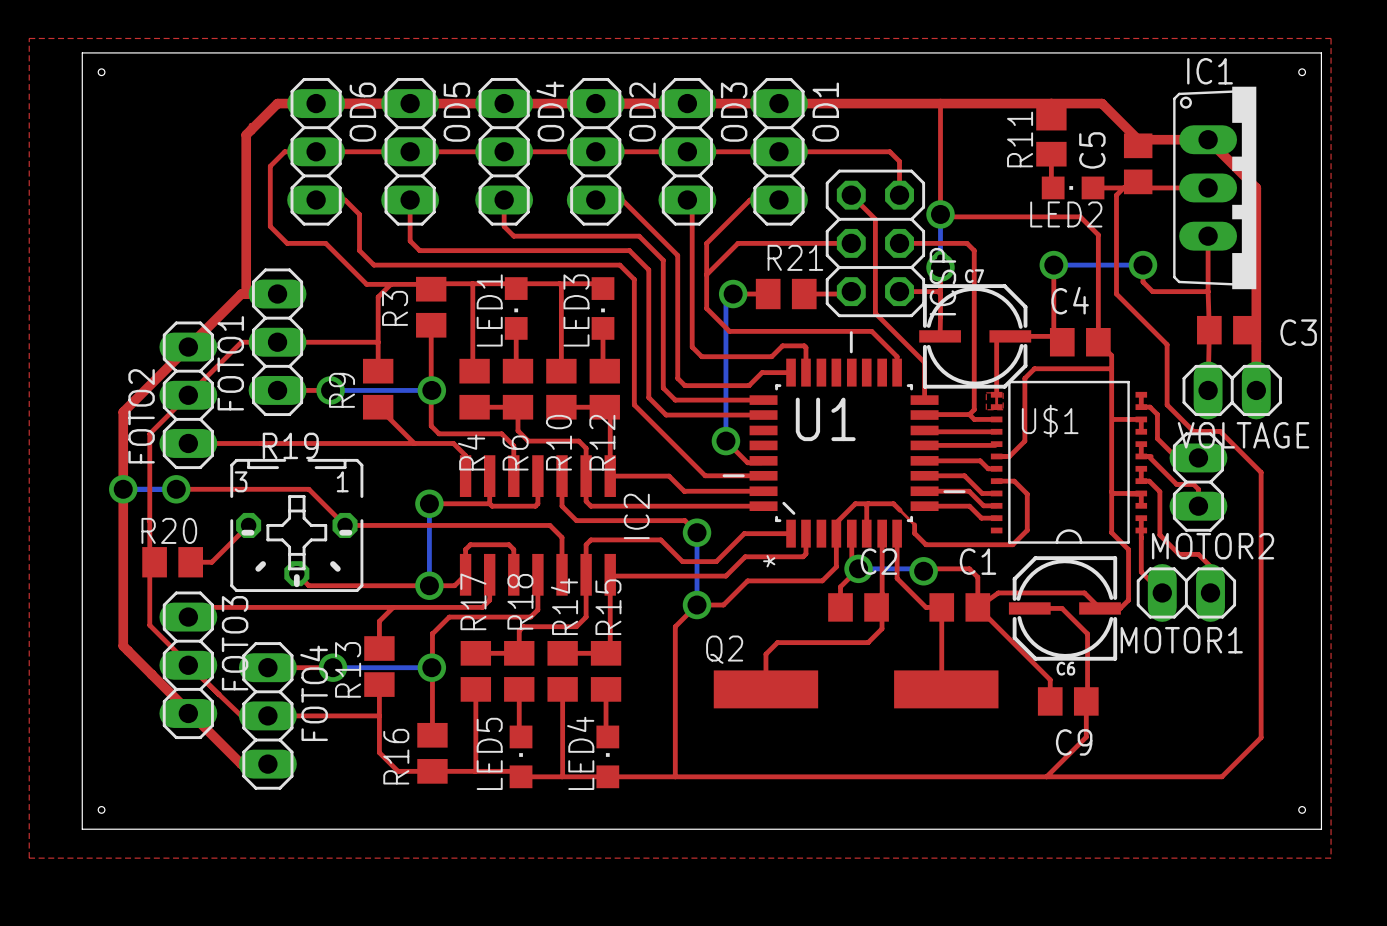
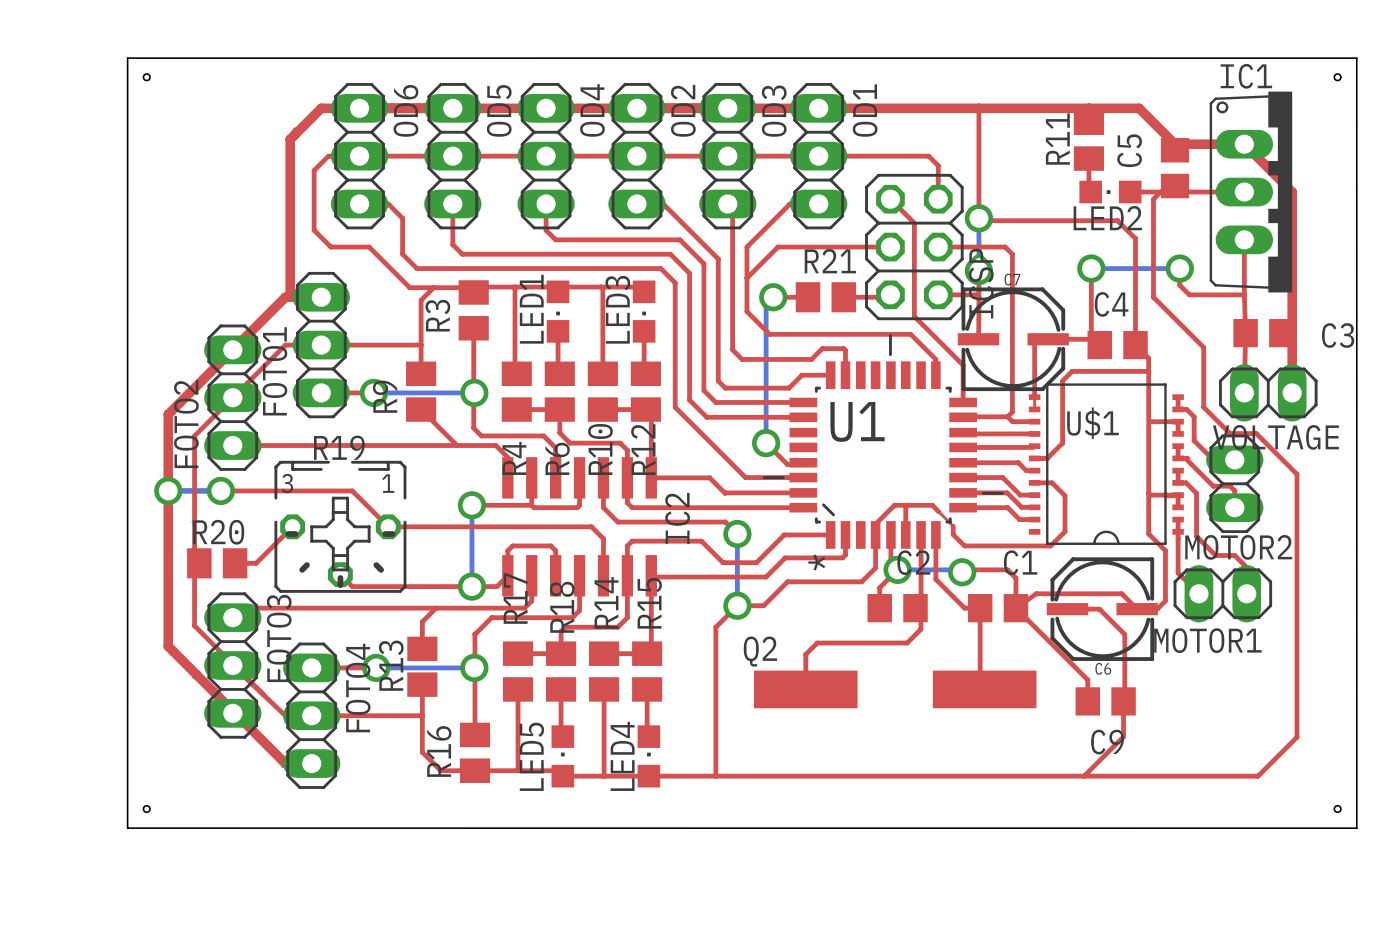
top zone outline: (29, 38) (1331, 38) (1331, 858) (29, 858) (29, 38) -> none
top zone outline: (986, 392) (1003, 392) (1003, 409) (986, 409) (986, 392) -> none

